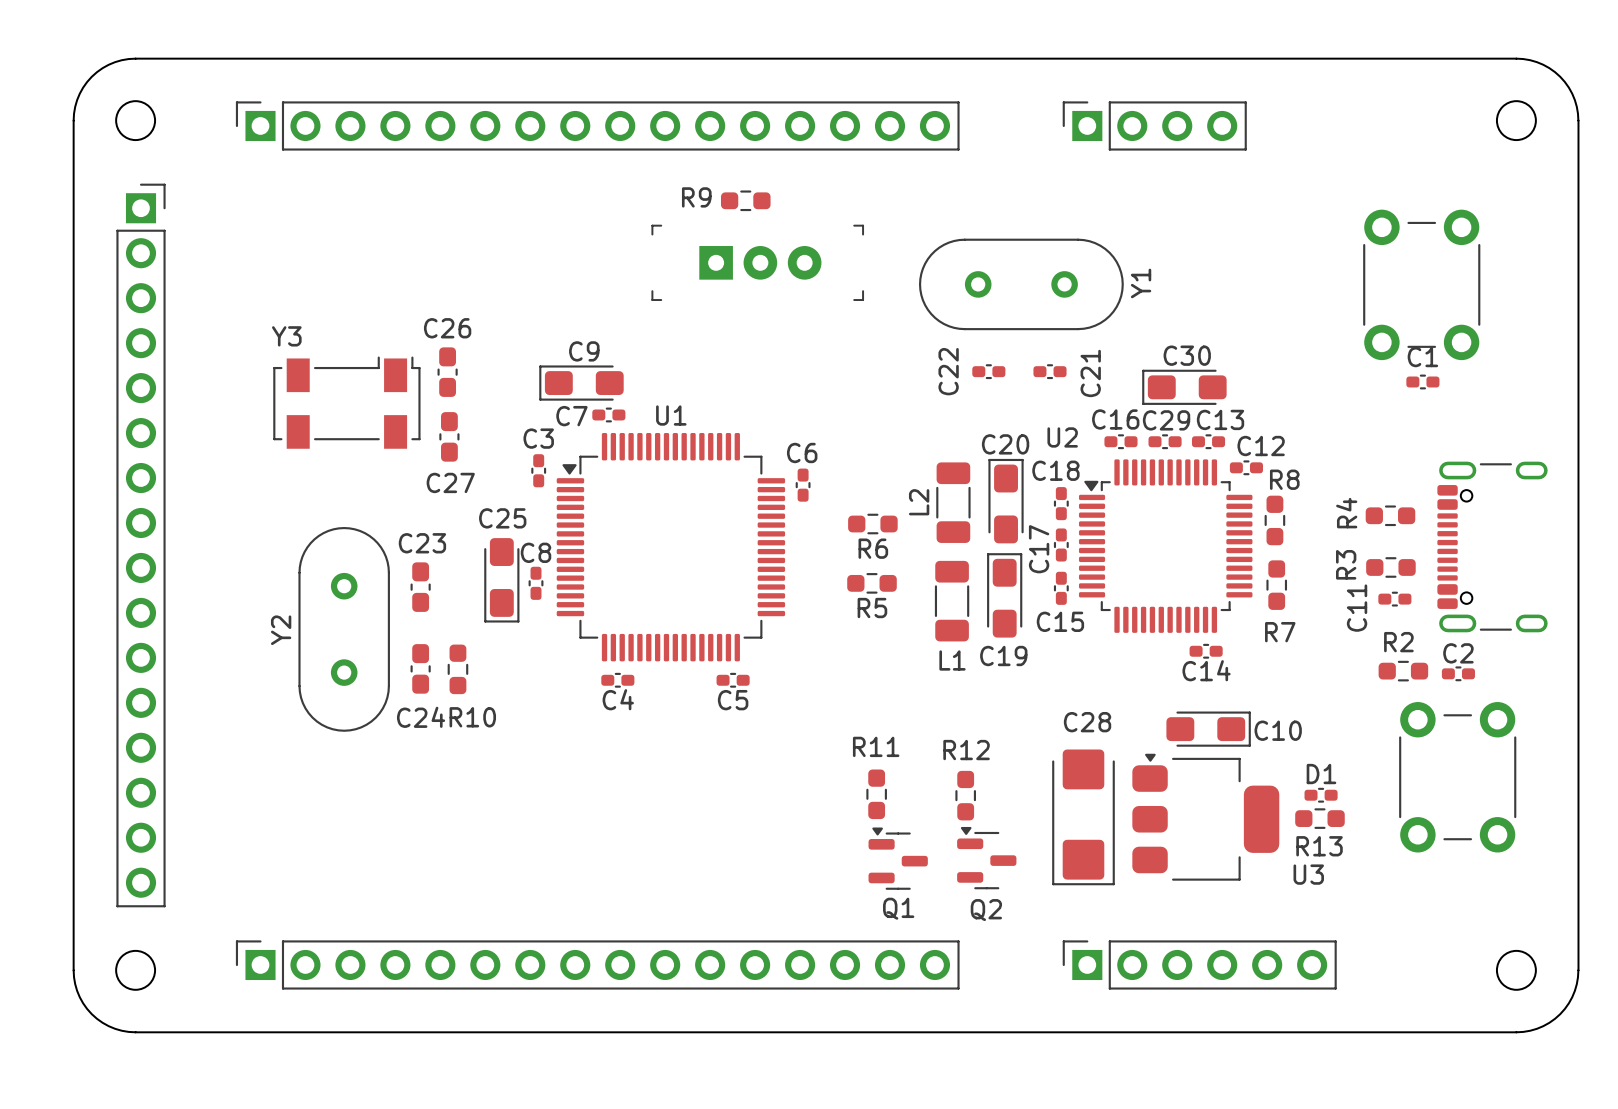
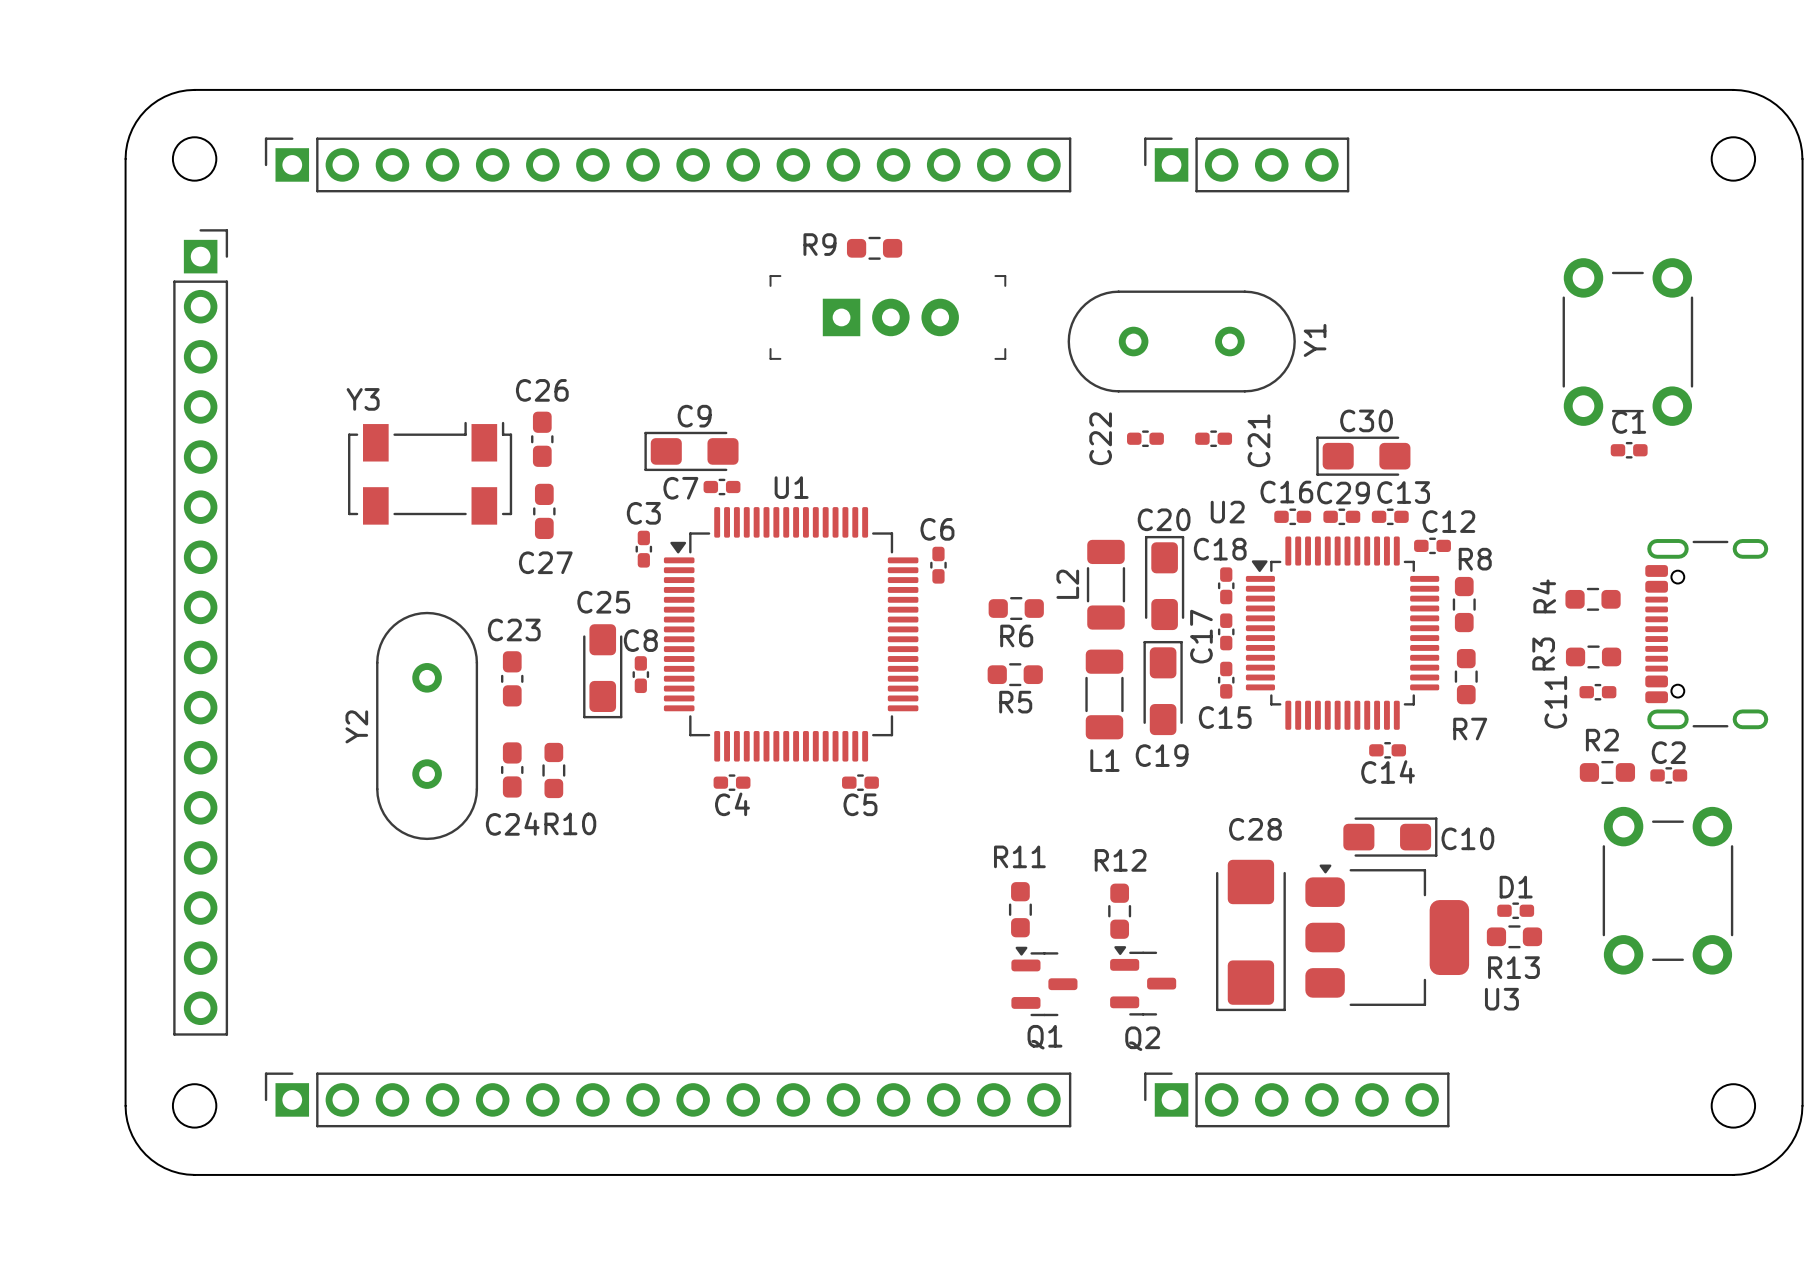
part position: (597, 125) -> (668, 164)
part position: (1154, 125) -> (1246, 164)
part position: (597, 964) -> (668, 1099)
part position: (1199, 964) -> (1296, 1099)

